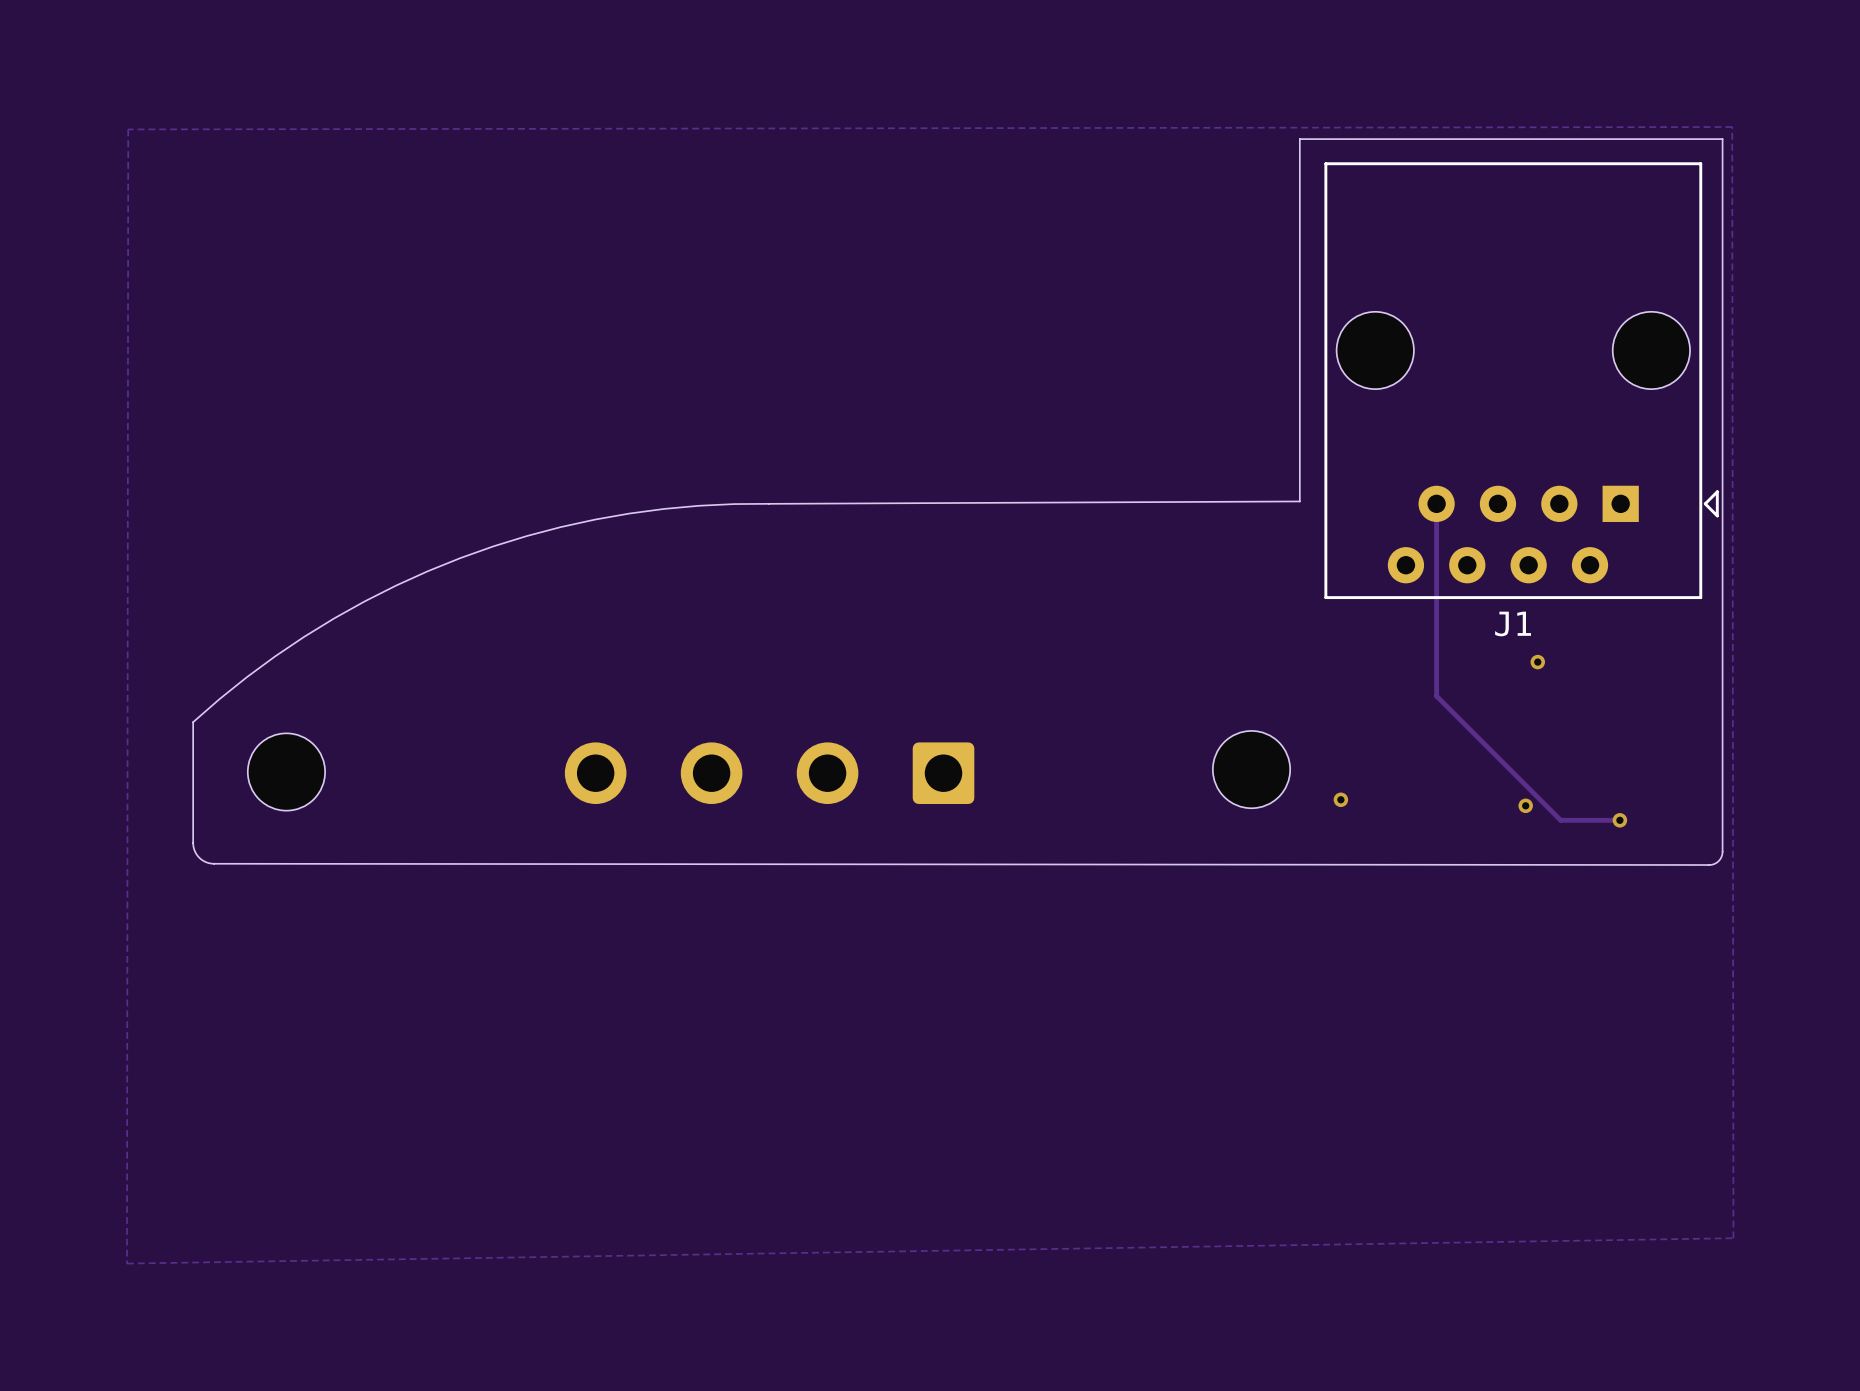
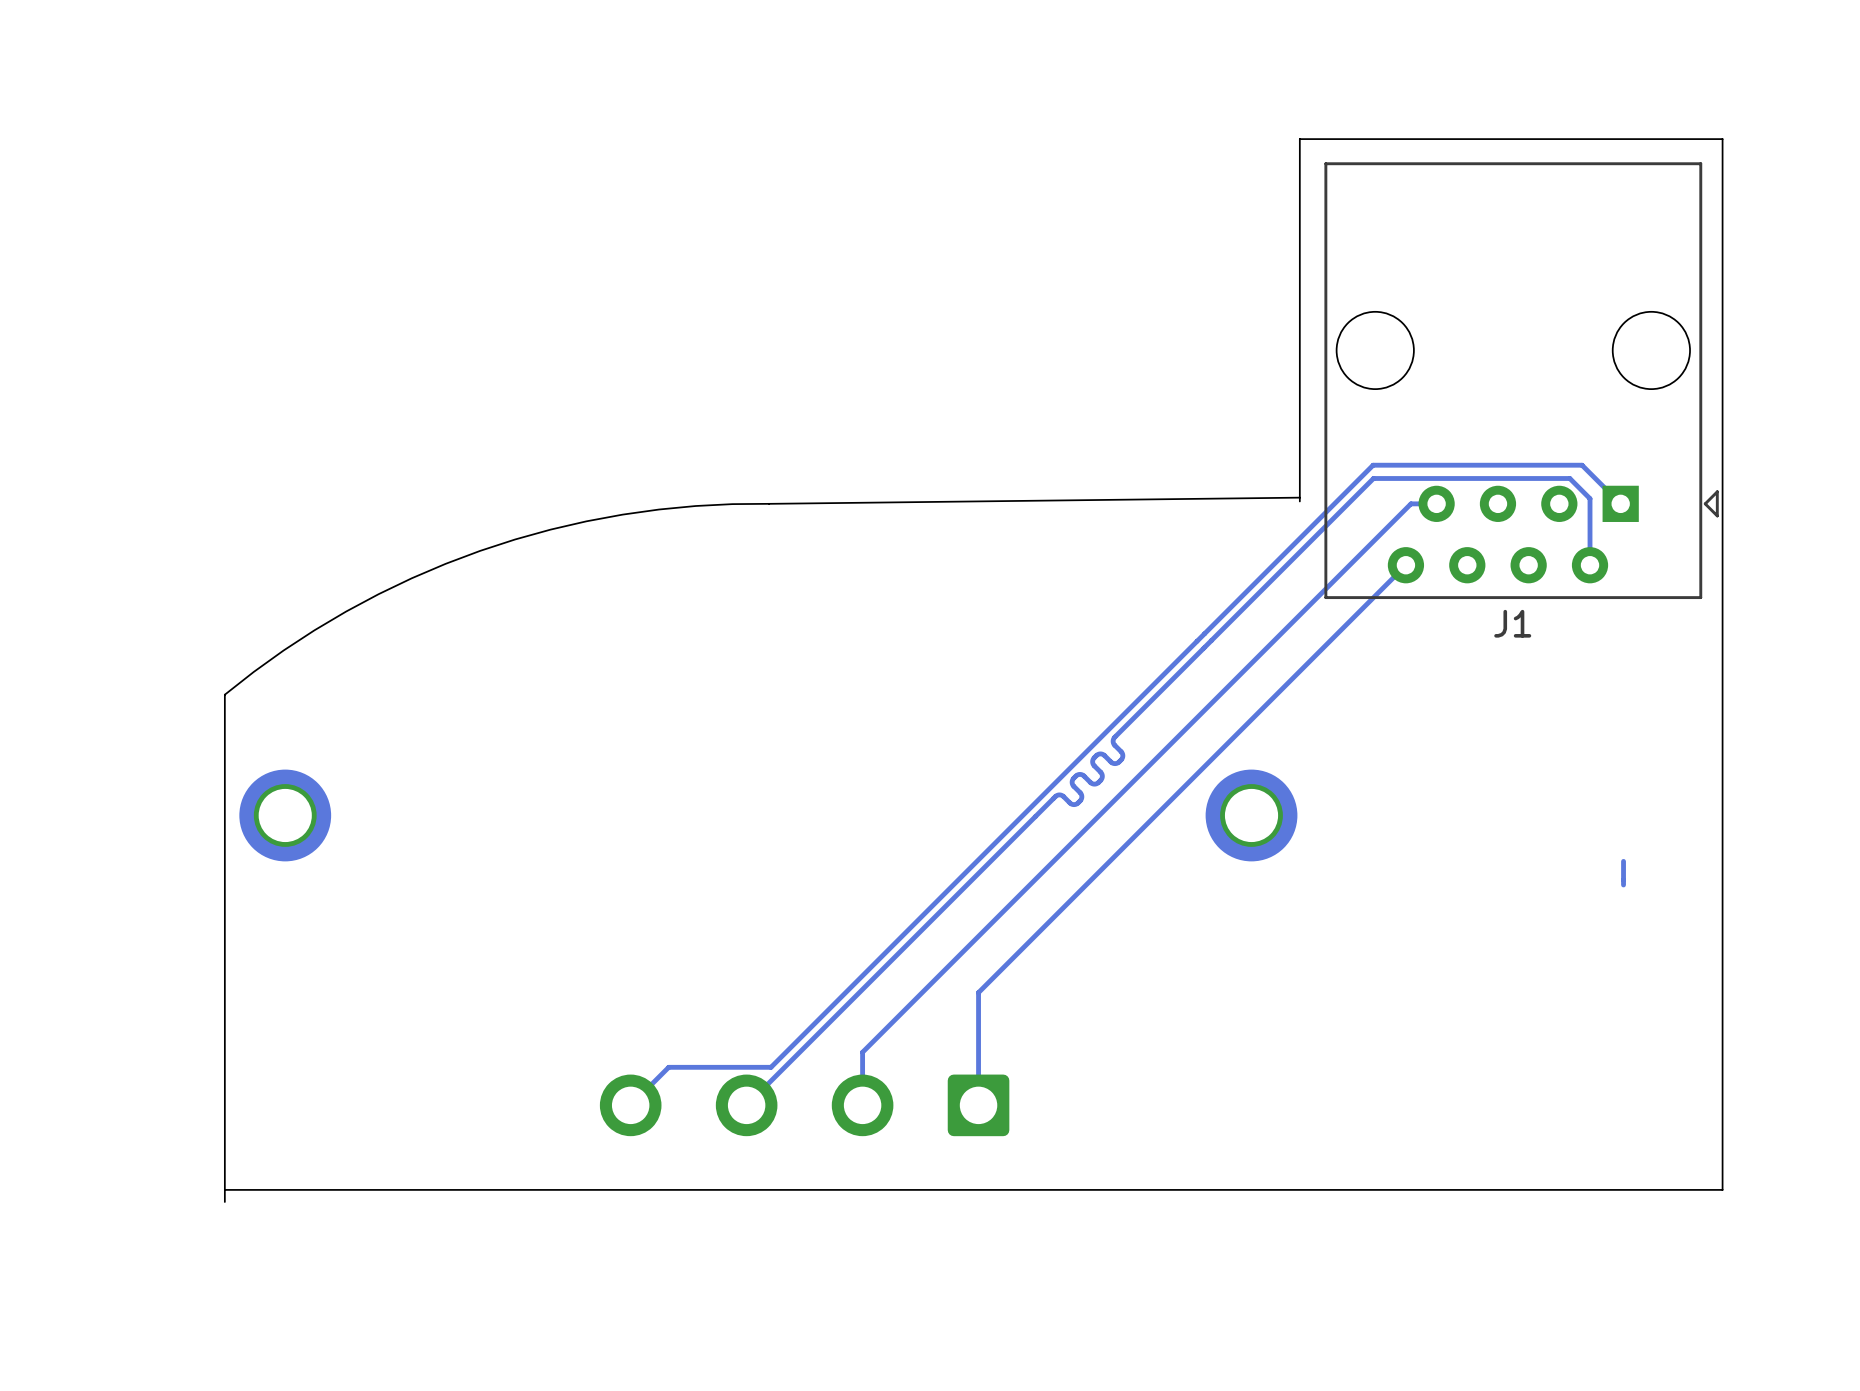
zone outline: (1732, 127) (128, 129) (127, 1263) (1733, 1238) (1732, 127) -> none
board edge: none -> (1299, 497) (732, 504) (659, 509) (622, 514) (550, 529) (480, 550) (445, 563) (378, 594) (314, 630) (283, 650) (224, 694) (224, 1201)
board edge: (1299, 501) (699, 505) (595, 519) (493, 546) (427, 571) (334, 618) (275, 656) (193, 722) (193, 845) (195, 851) (200, 859) (213, 863) -> none
track: (1436, 503) (1436, 696) (1560, 820) (1619, 820) -> (1436, 503) (1410, 503) (862, 1052) (862, 1105)
track: none -> (1620, 503) (1582, 465) (1373, 465) (771, 1067) (668, 1067) (630, 1105)
track: none -> (1405, 565) (978, 992) (978, 1105)
track: none -> (1590, 565) (1590, 498) (1569, 478) (1373, 478) (1114, 737) (1113, 743) (1122, 755) (1119, 761) (1112, 763) (1101, 753) (1094, 757) (1093, 763) (1102, 775) (1098, 782) (1091, 783) (1081, 774) (1075, 776) (1072, 783) (1081, 794) (1080, 800) (1072, 804) (1061, 795) (1055, 796) (746, 1105)
via: (1537, 662) -> none
part: (1251, 769) -> none
part: (286, 772) -> none
part position: (769, 773) -> (804, 1105)
via: (1340, 799) -> none
via: (1525, 805) -> none
part: none -> (285, 815)
part: none -> (1251, 815)
via: (1619, 820) -> none
board edge: (1722, 851) (1718, 861) (1709, 865) (214, 863) -> (1722, 851) (1722, 1189) (224, 1189)
track: none -> (1623, 861) (1623, 884)

